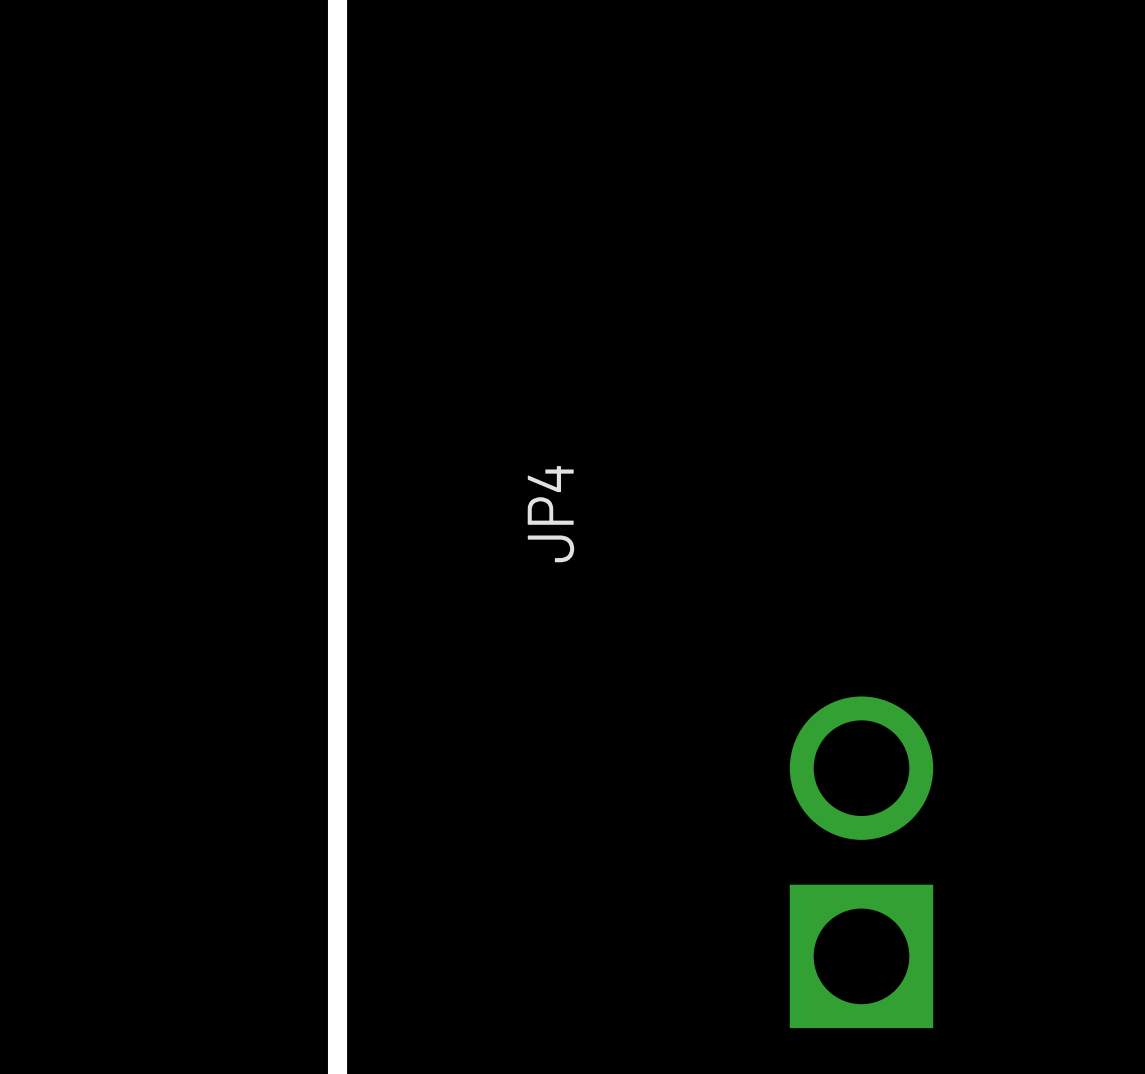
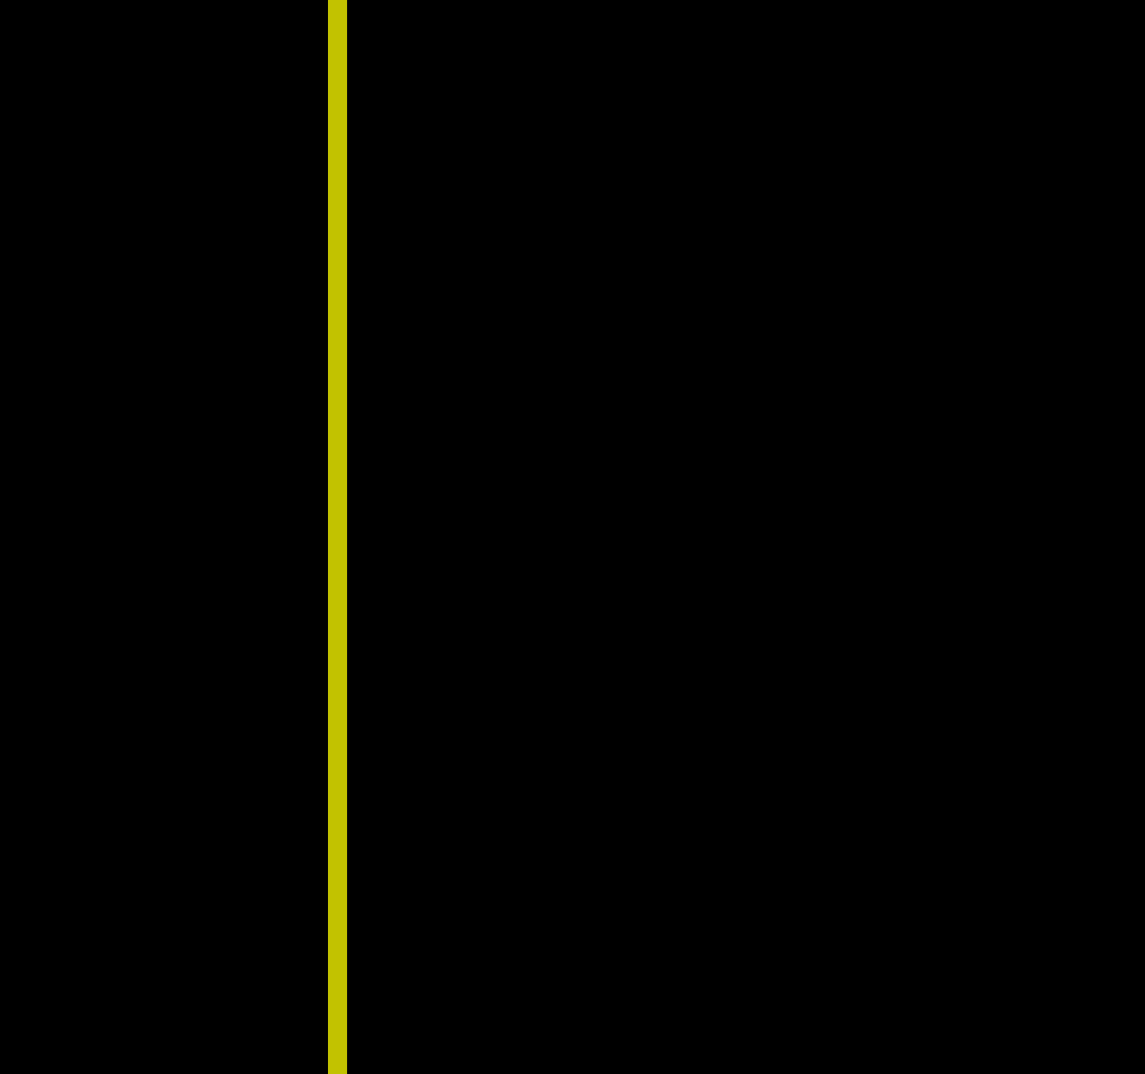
JP4: (861, 862) -> none

